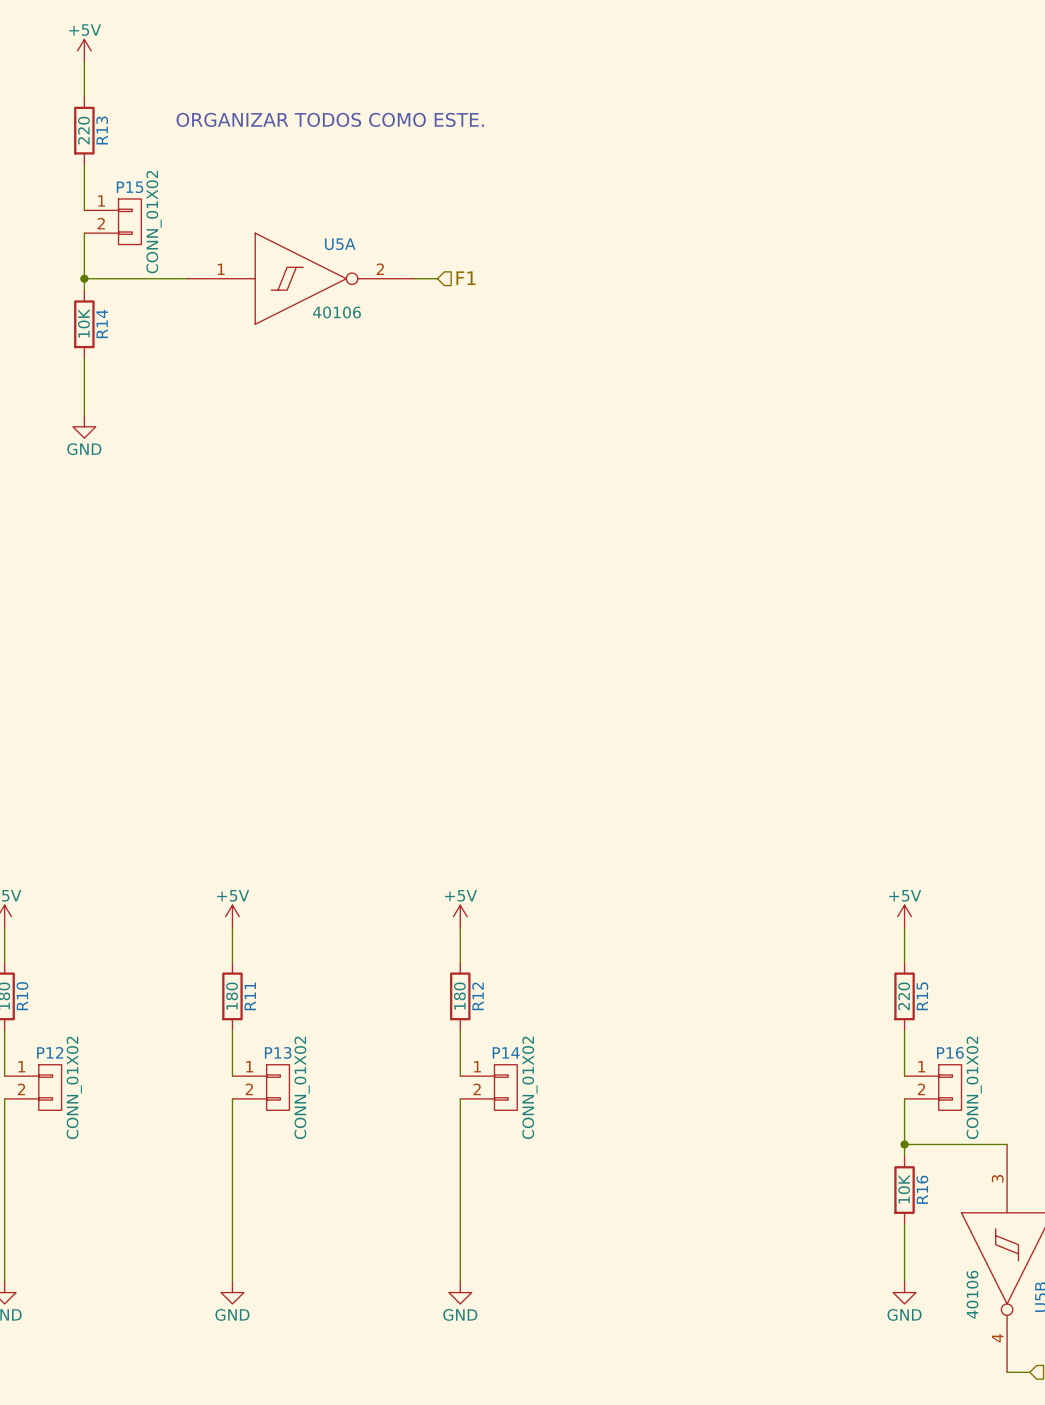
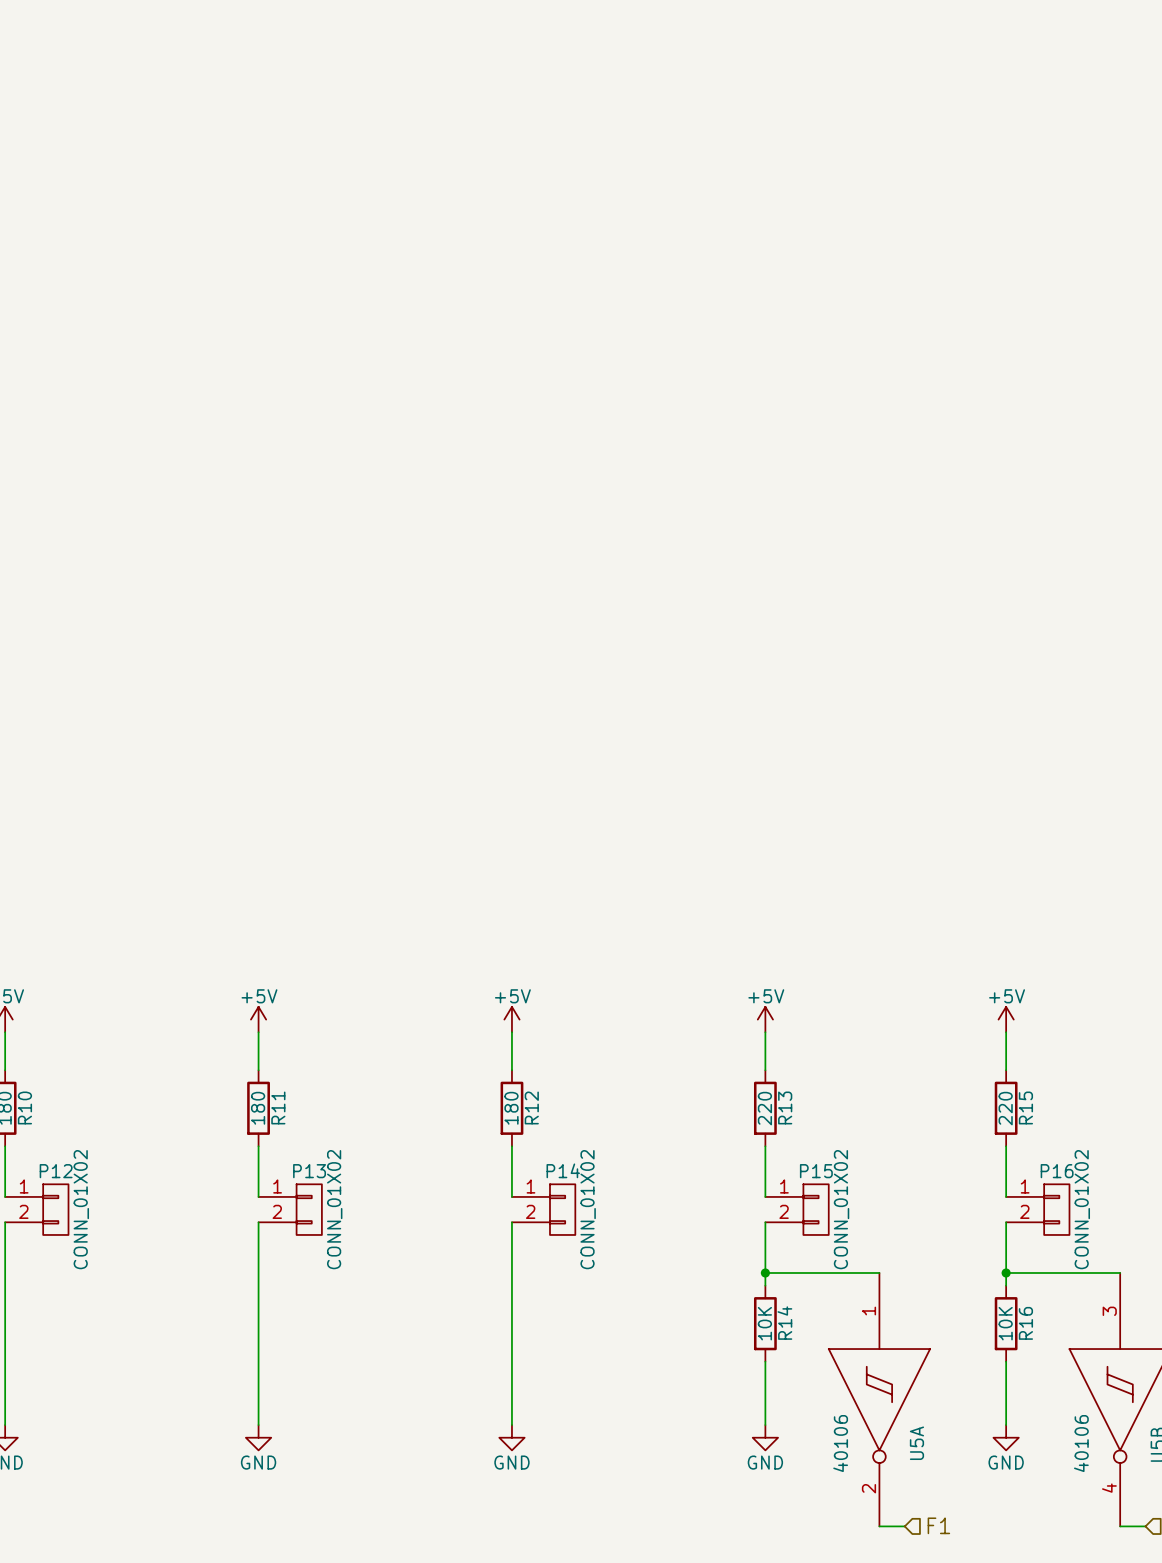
power symbol: +5V (84, 50) -> none
wire: (84, 62) (84, 96) -> none
text: ORGANIZAR TODOS COMO ESTE. (330, 119) -> none
R13 position: (84, 130) -> (765, 1108)
wire: (84, 164) (84, 210) -> none
P15 position: (112, 221) -> (797, 1209)
wire: (84, 233) (84, 290) -> none
wire: (84, 278) (186, 278) -> none
junction: (84, 278) -> none
U5A rotation: 0° (300, 278) -> 90° clockwise (879, 1399)
U5A position: (300, 278) -> (879, 1399)
wire: (414, 278) (437, 278) -> none
hierarchical label: F1 (466, 278) -> none
R14 position: (84, 324) -> (765, 1323)
wire: (84, 358) (84, 415) -> none
power symbol: GND (84, 426) -> none
power symbol: none -> +5V (765, 1019)
wire: none -> (765, 1032) (765, 1070)
wire: none -> (765, 1146) (765, 1196)
wire: none -> (765, 1222) (765, 1285)
wire: none -> (765, 1272) (879, 1272)
junction: none -> (765, 1272)
wire: none -> (765, 1361) (765, 1425)
power symbol: none -> GND (765, 1437)
hierarchical label: none -> F1 (938, 1525)
wire: none -> (879, 1526) (904, 1526)

